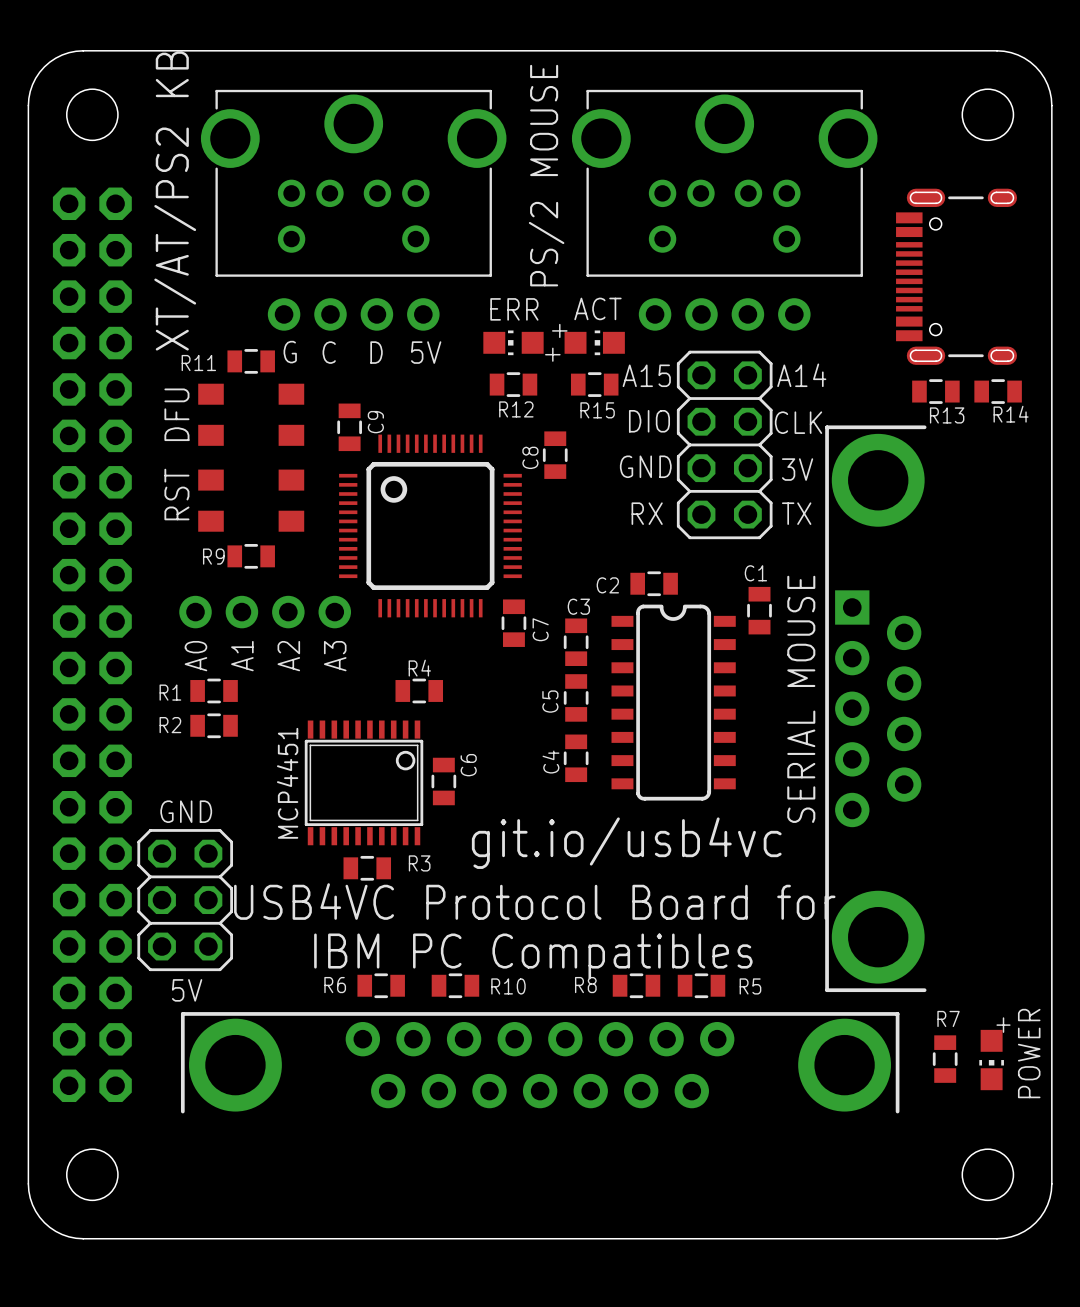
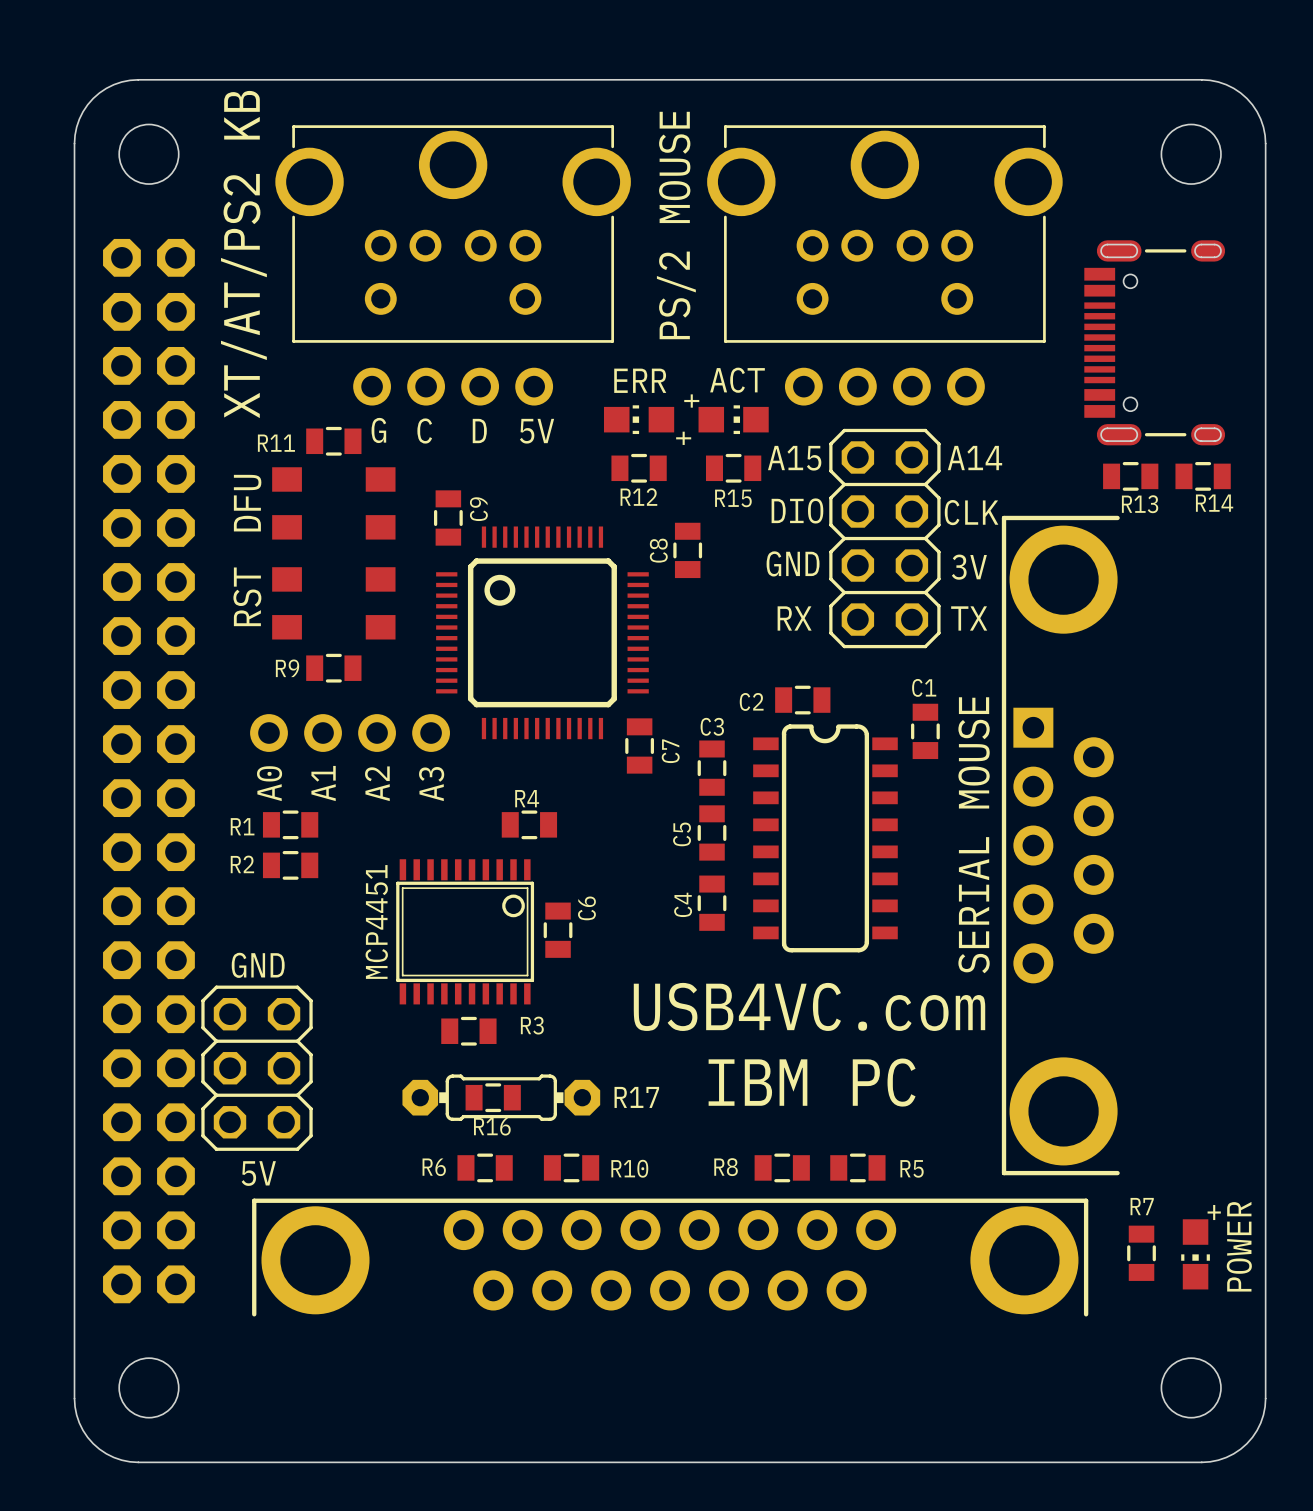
text: git.io/usb4vc (626, 843) -> none
text: none -> USB4VC.com (809, 1006)
text: USB4VC Protocol Board for (534, 901) -> none
text: none -> IBM PC (812, 1082)
R16: none -> (493, 1097)
R17: none -> (501, 1097)
text: IBM PC Compatibles (533, 956) -> none

